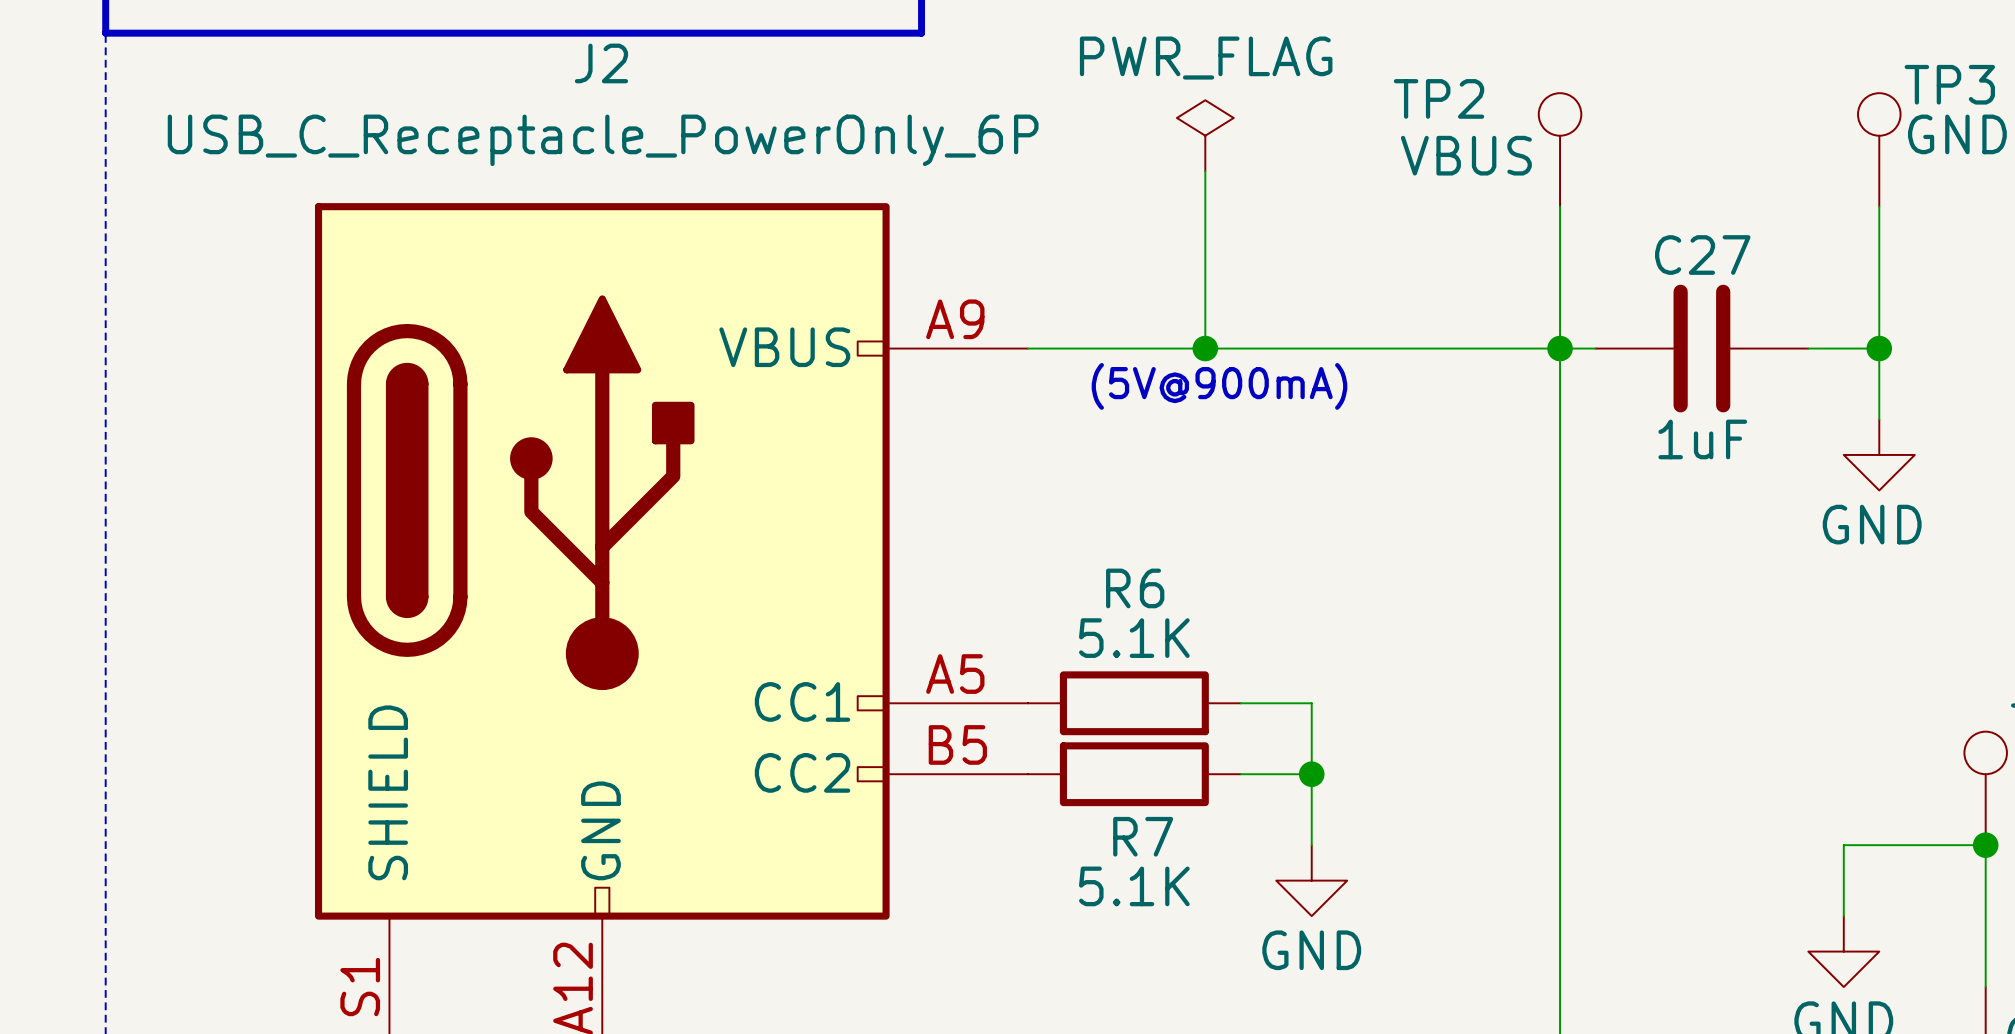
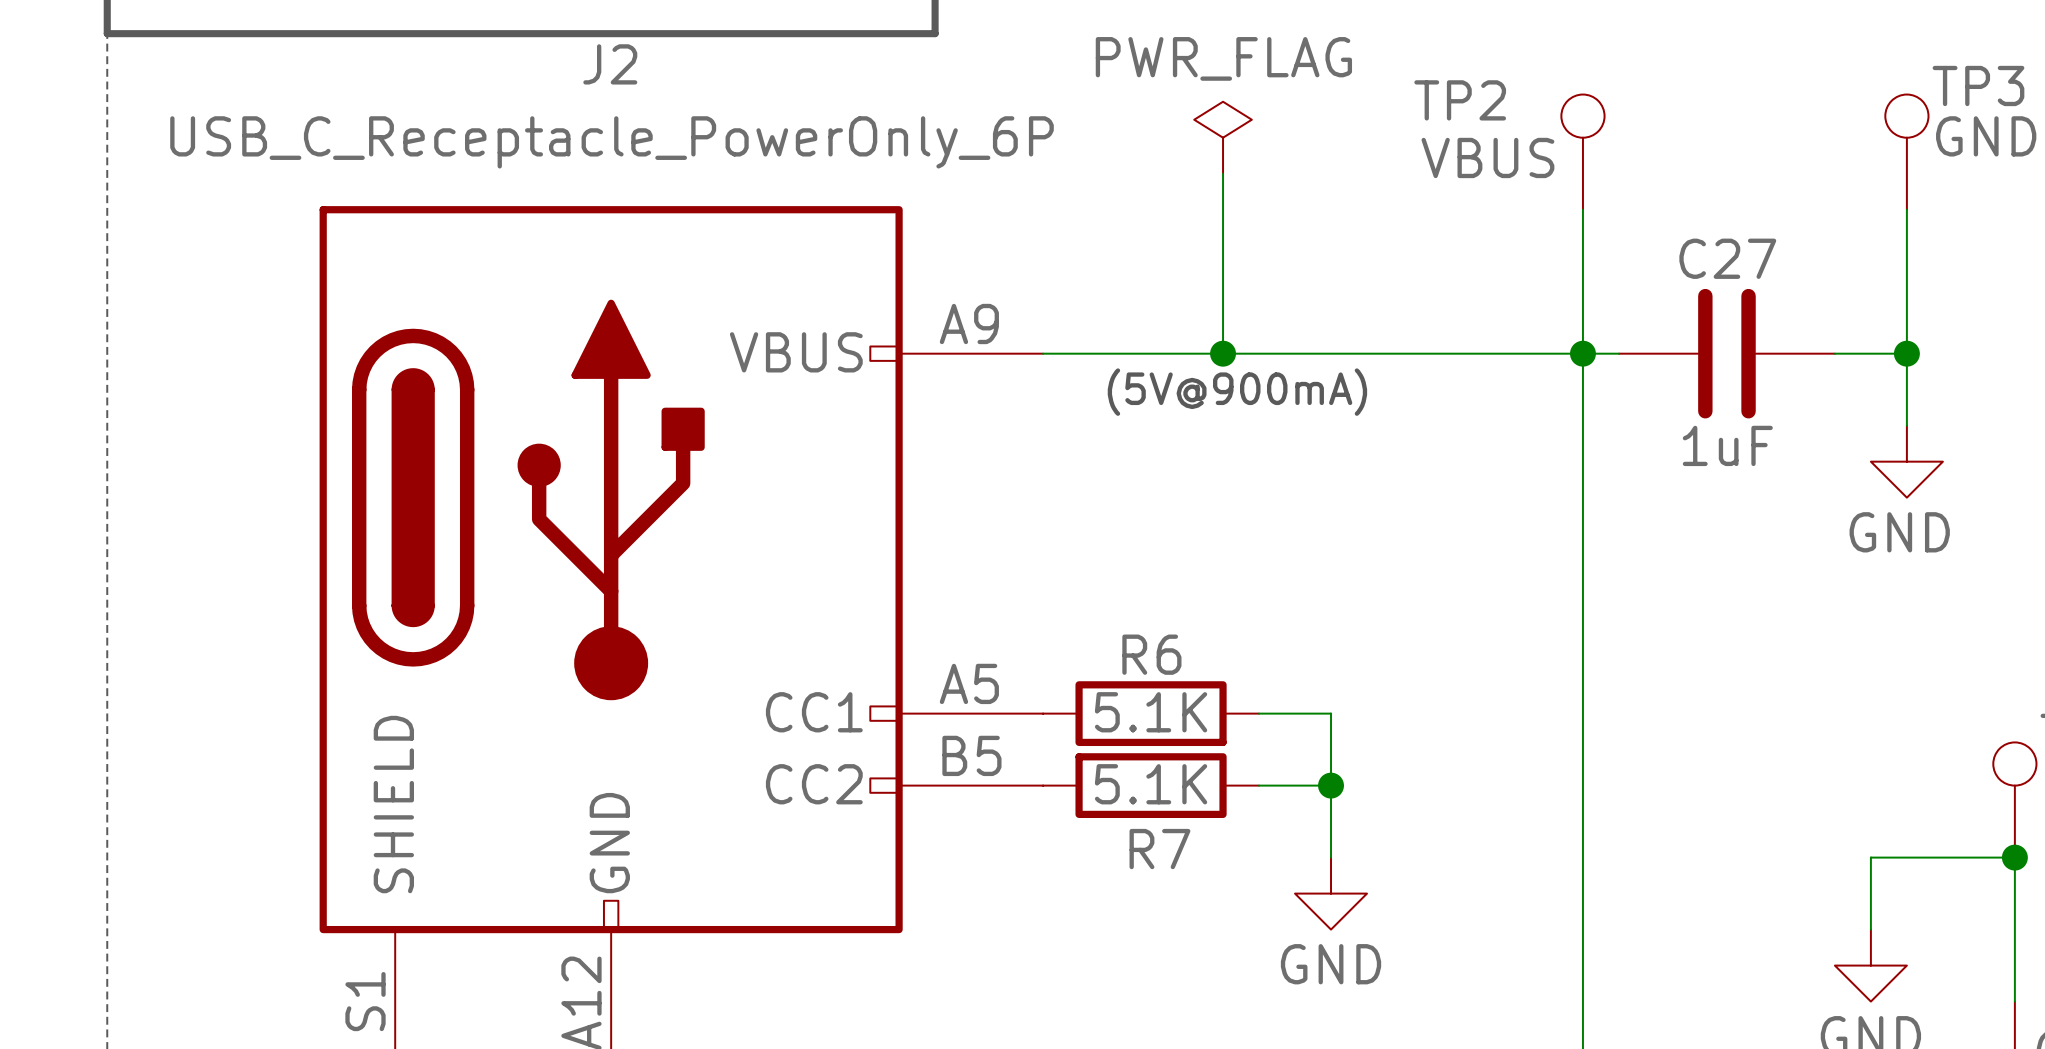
R6 name position: R6 (1135, 588) -> R6 (1151, 654)
R6 value position: 5.1K (1134, 638) -> 5.1K (1151, 712)
R7 value position: 5.1K (1134, 886) -> 5.1K (1151, 784)

